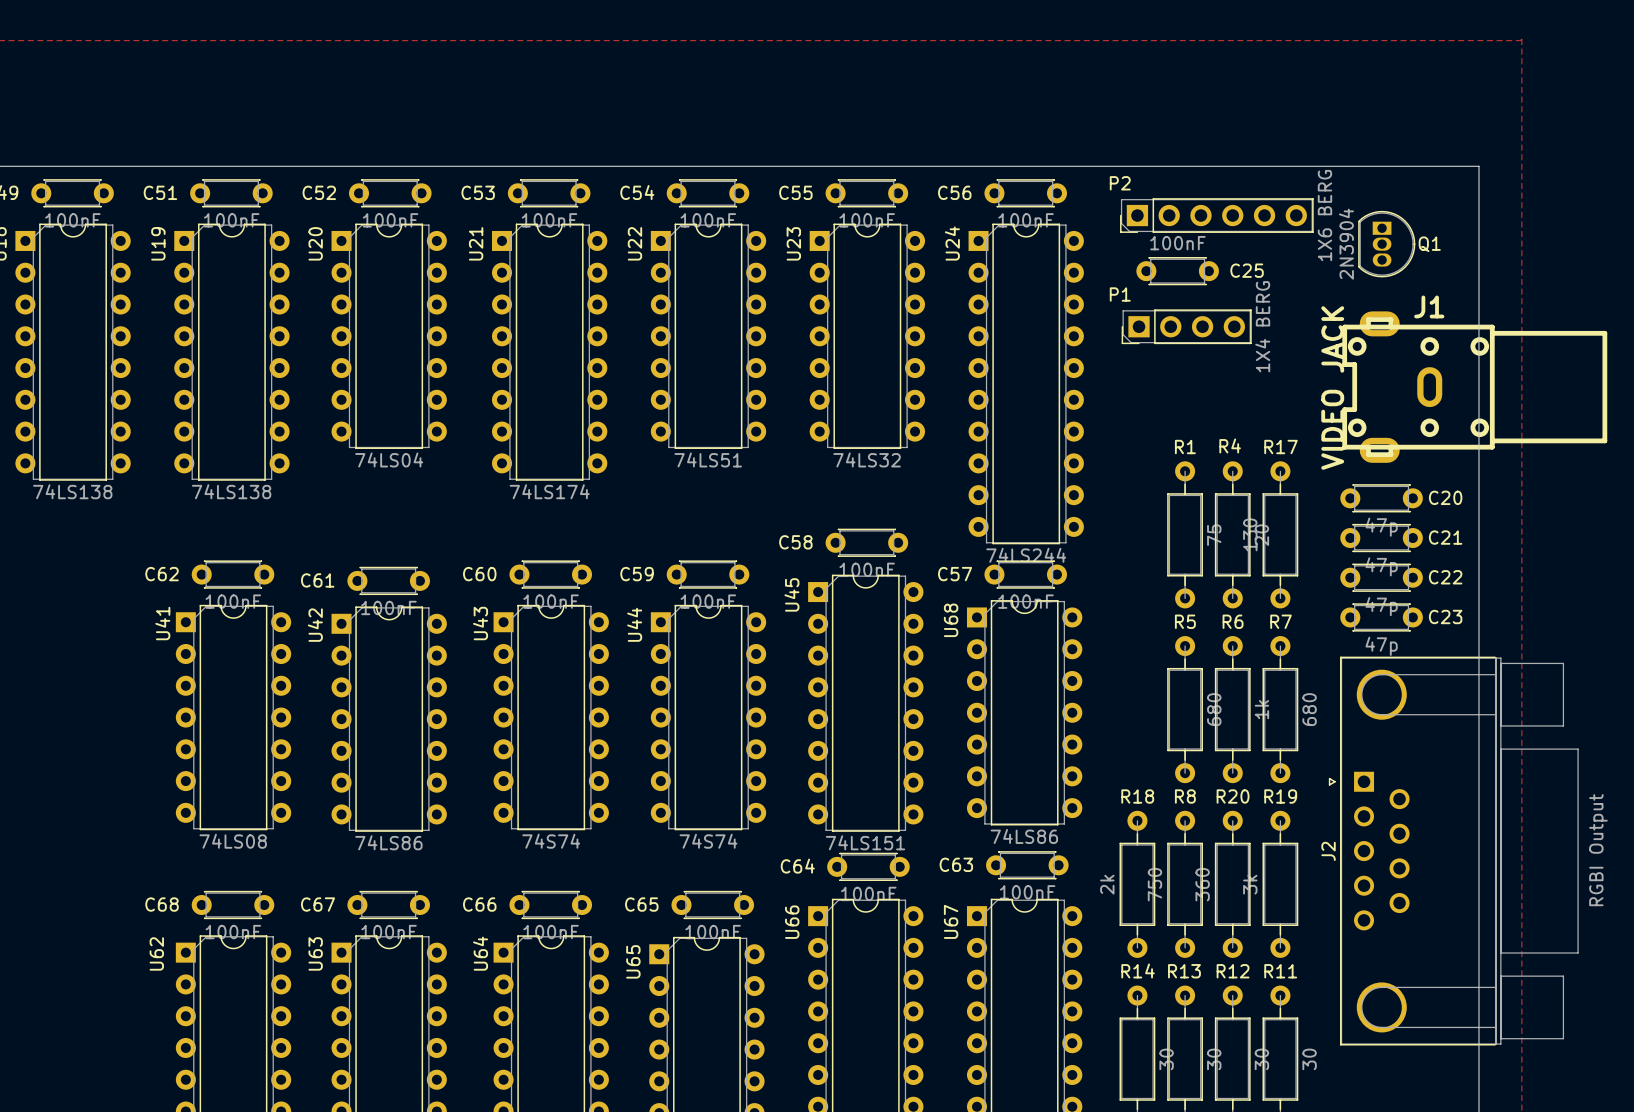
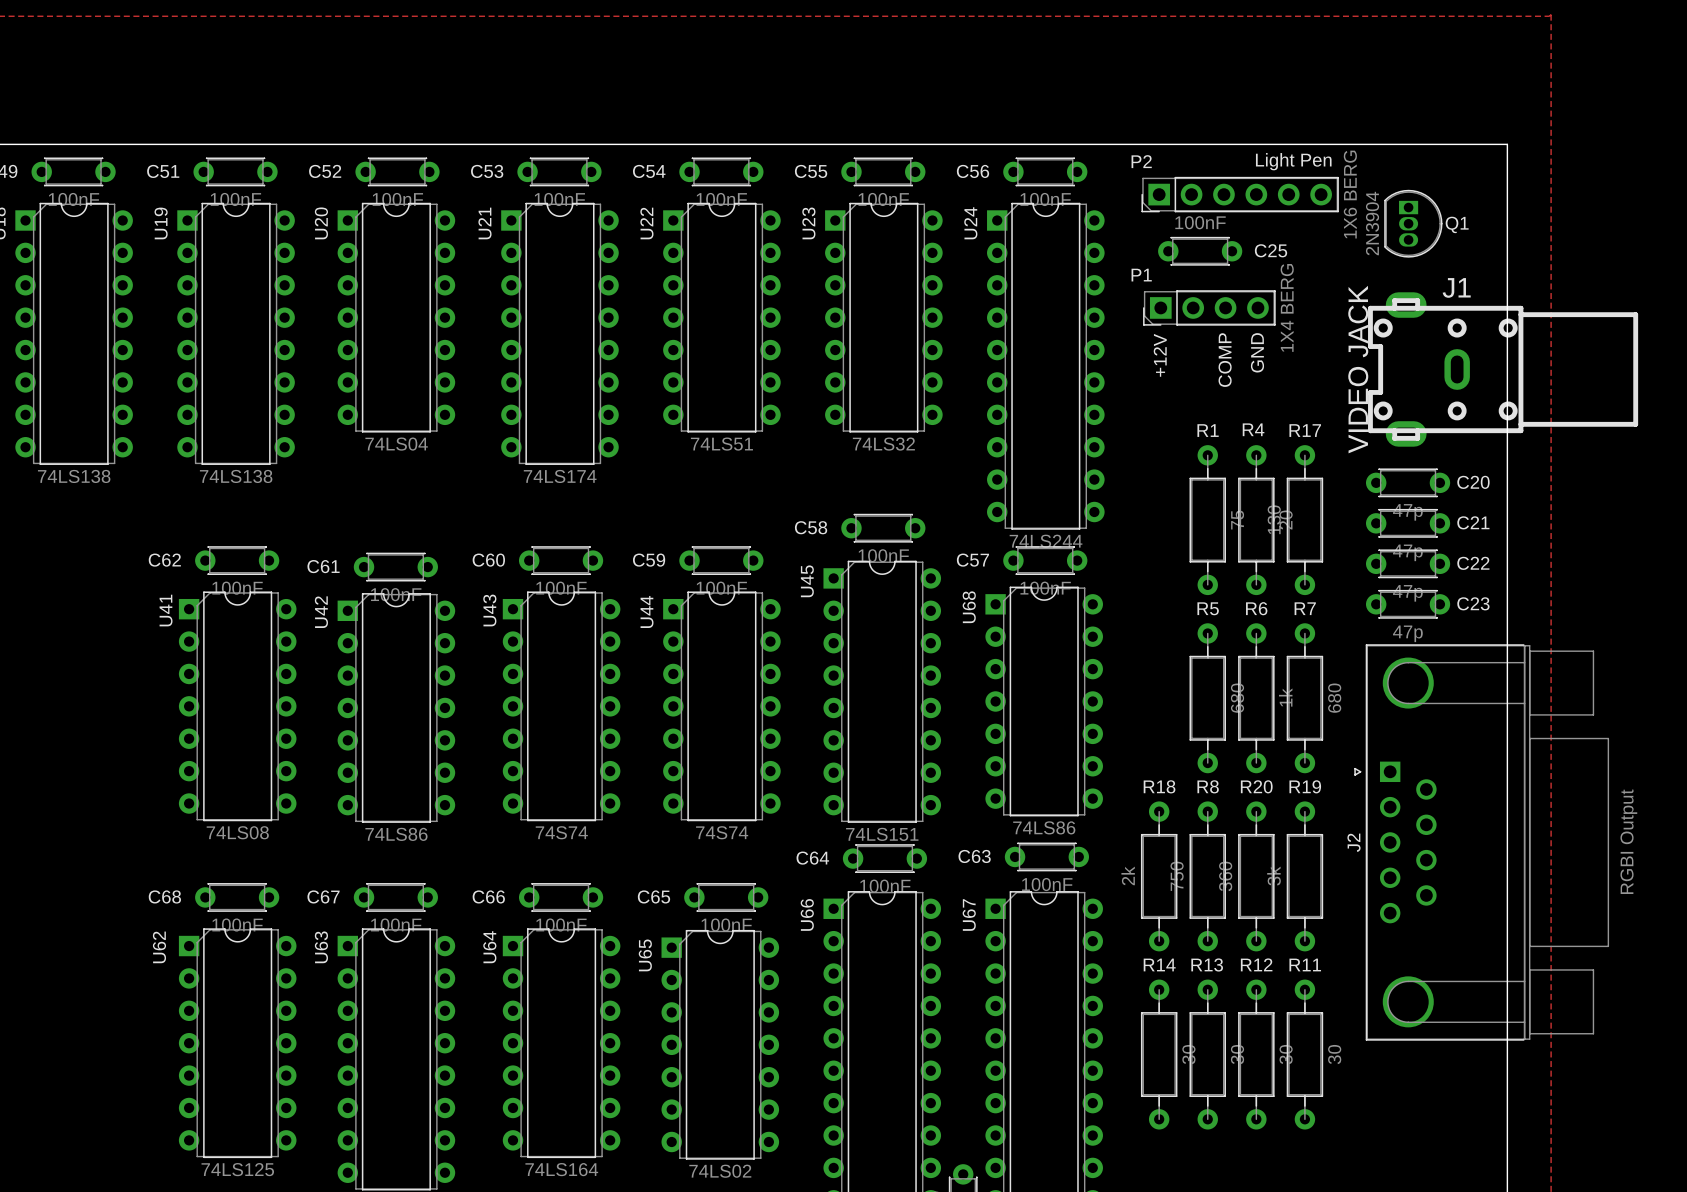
text: none -> Light Pen (1293, 161)
text: none -> GND (1257, 352)
text: none -> +12V (1160, 355)
text: none -> COMP (1225, 360)

